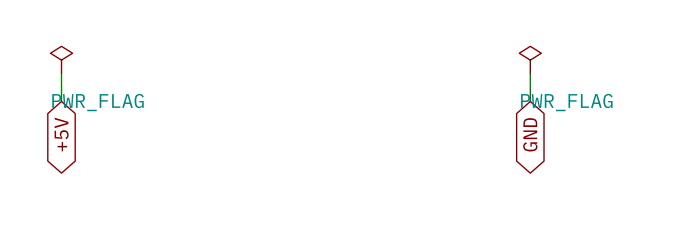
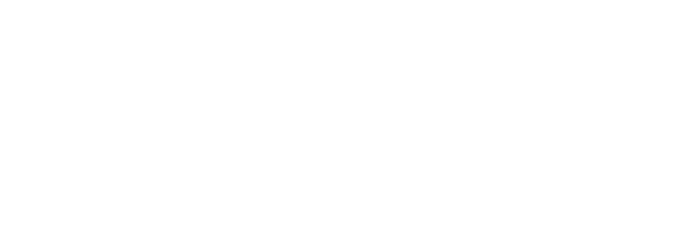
power symbol: PWR_FLAG (61, 60) -> none
power symbol: PWR_FLAG (530, 60) -> none
wire: (61, 73) (61, 101) -> none
wire: (530, 73) (530, 101) -> none
global label: +5V (61, 134) -> none
global label: GND (530, 134) -> none

